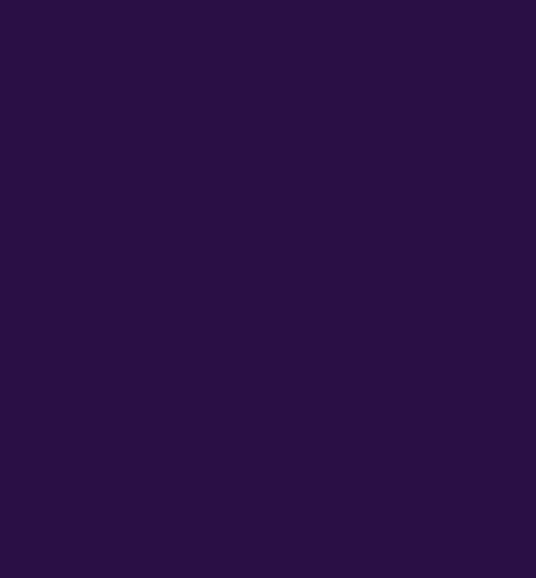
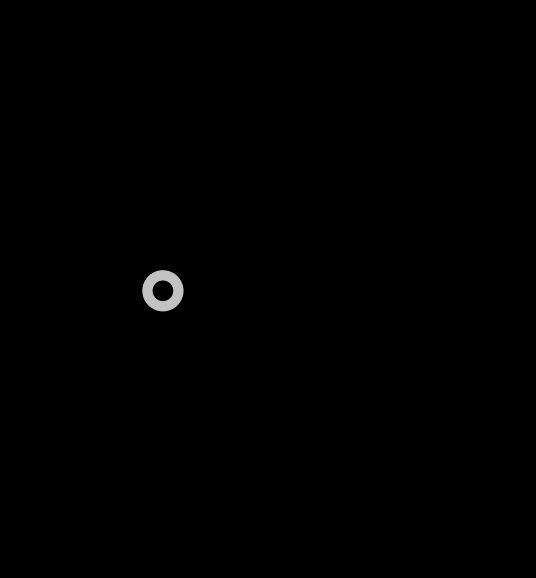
via: none -> (162, 290)

